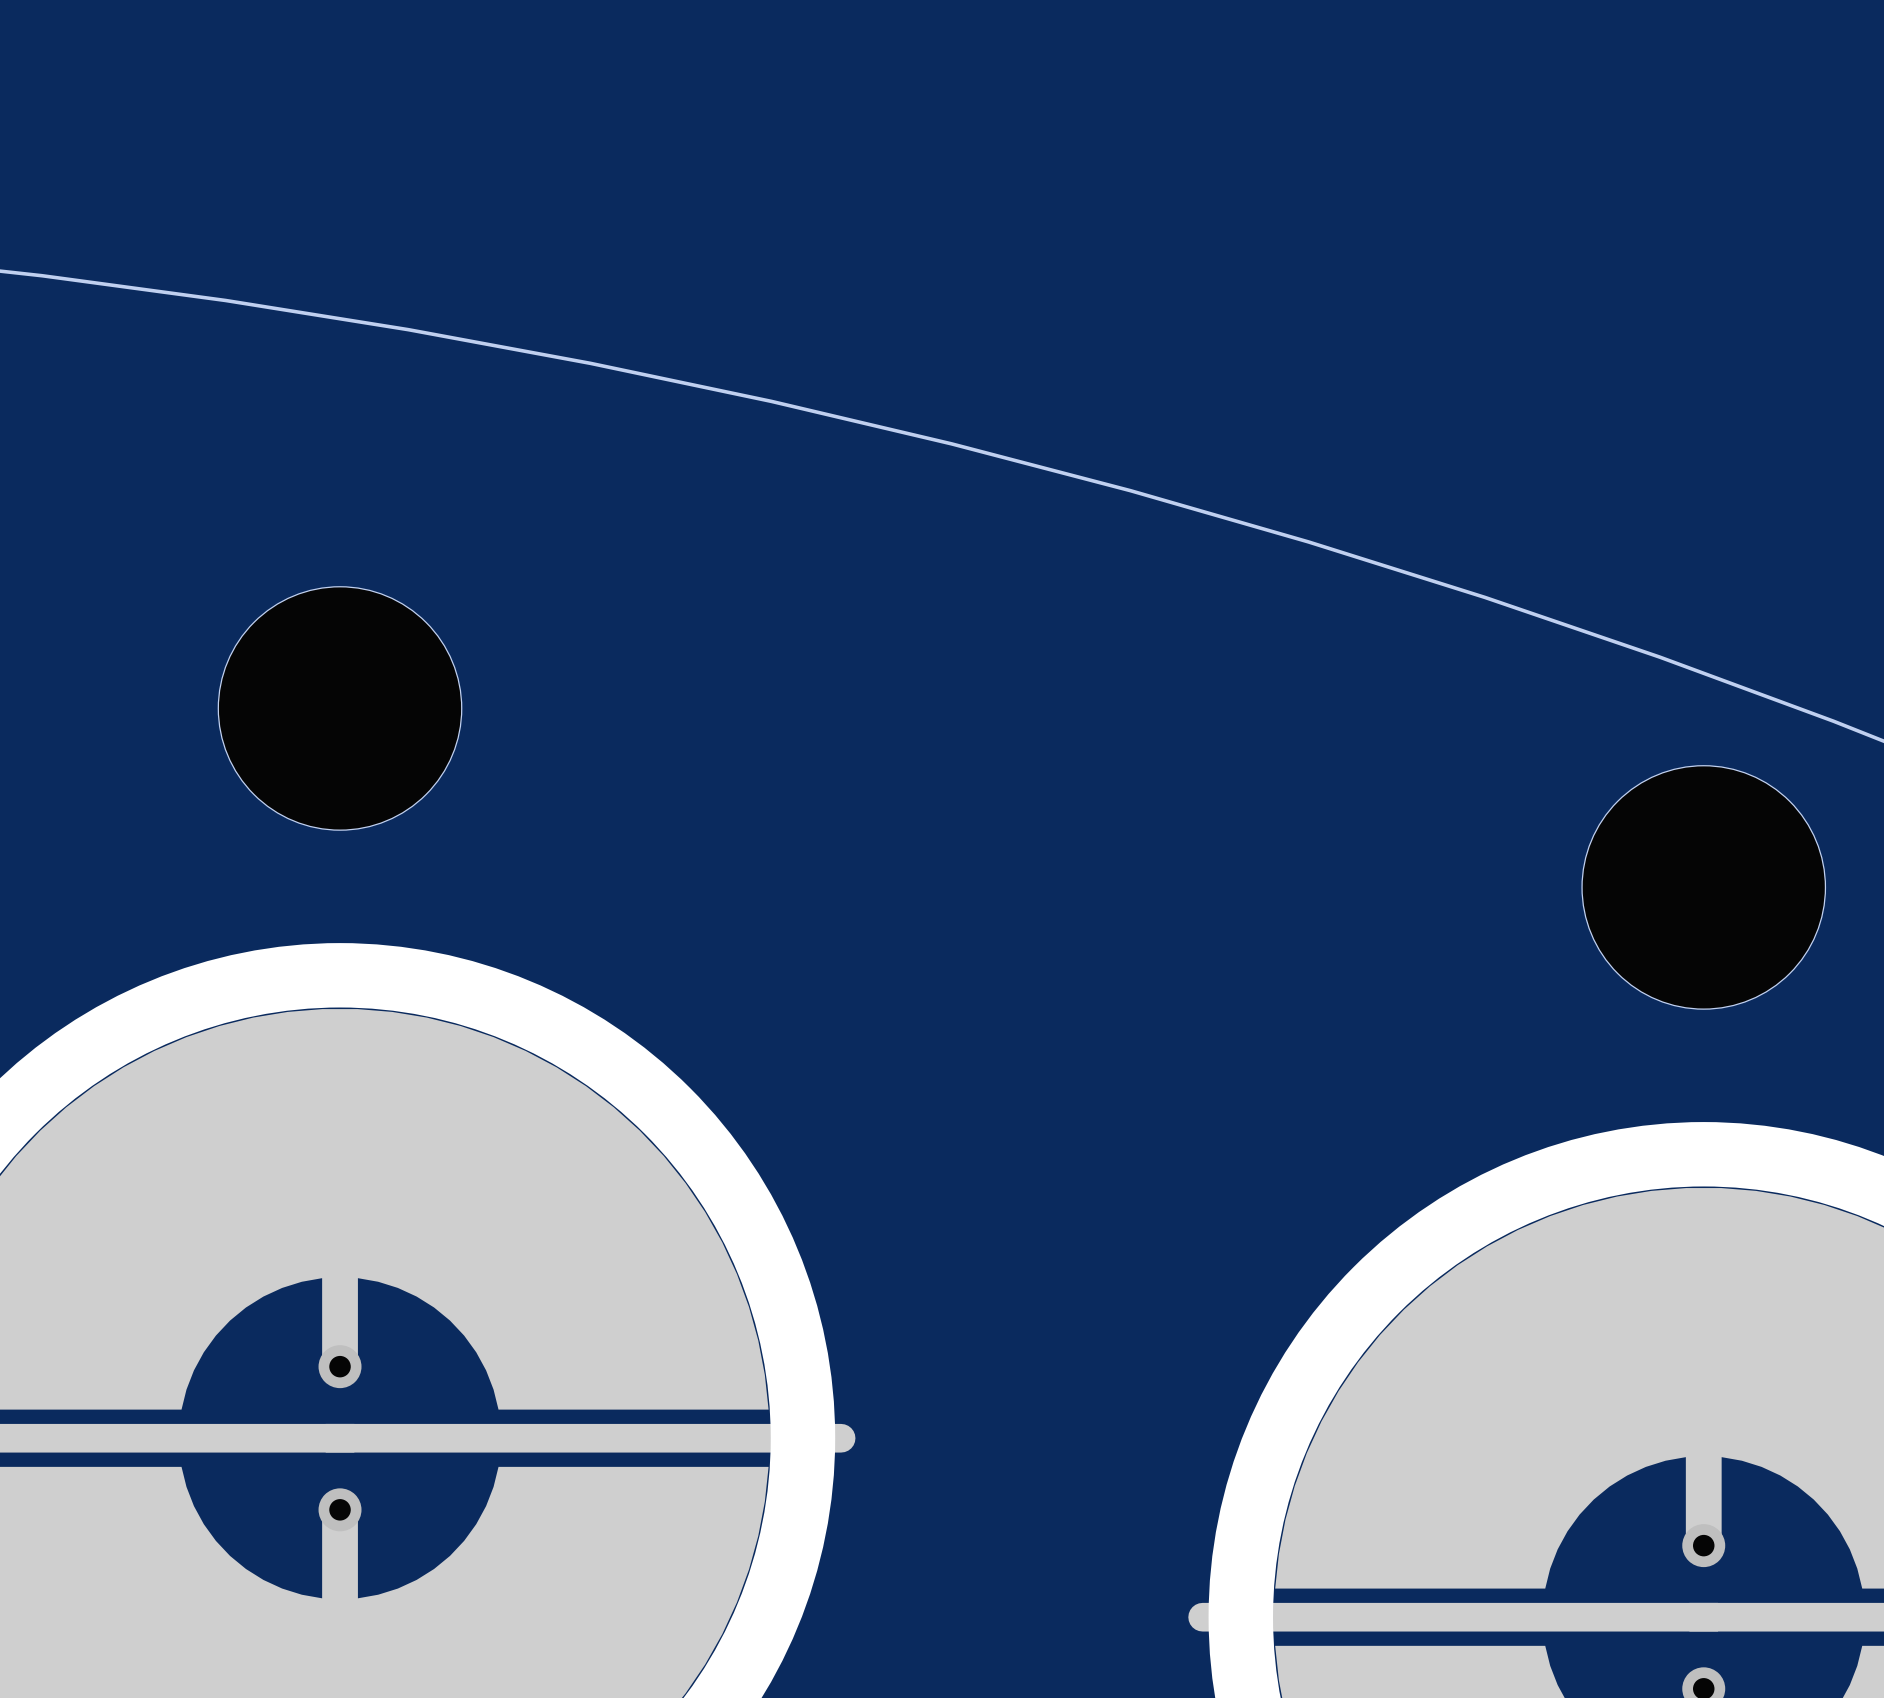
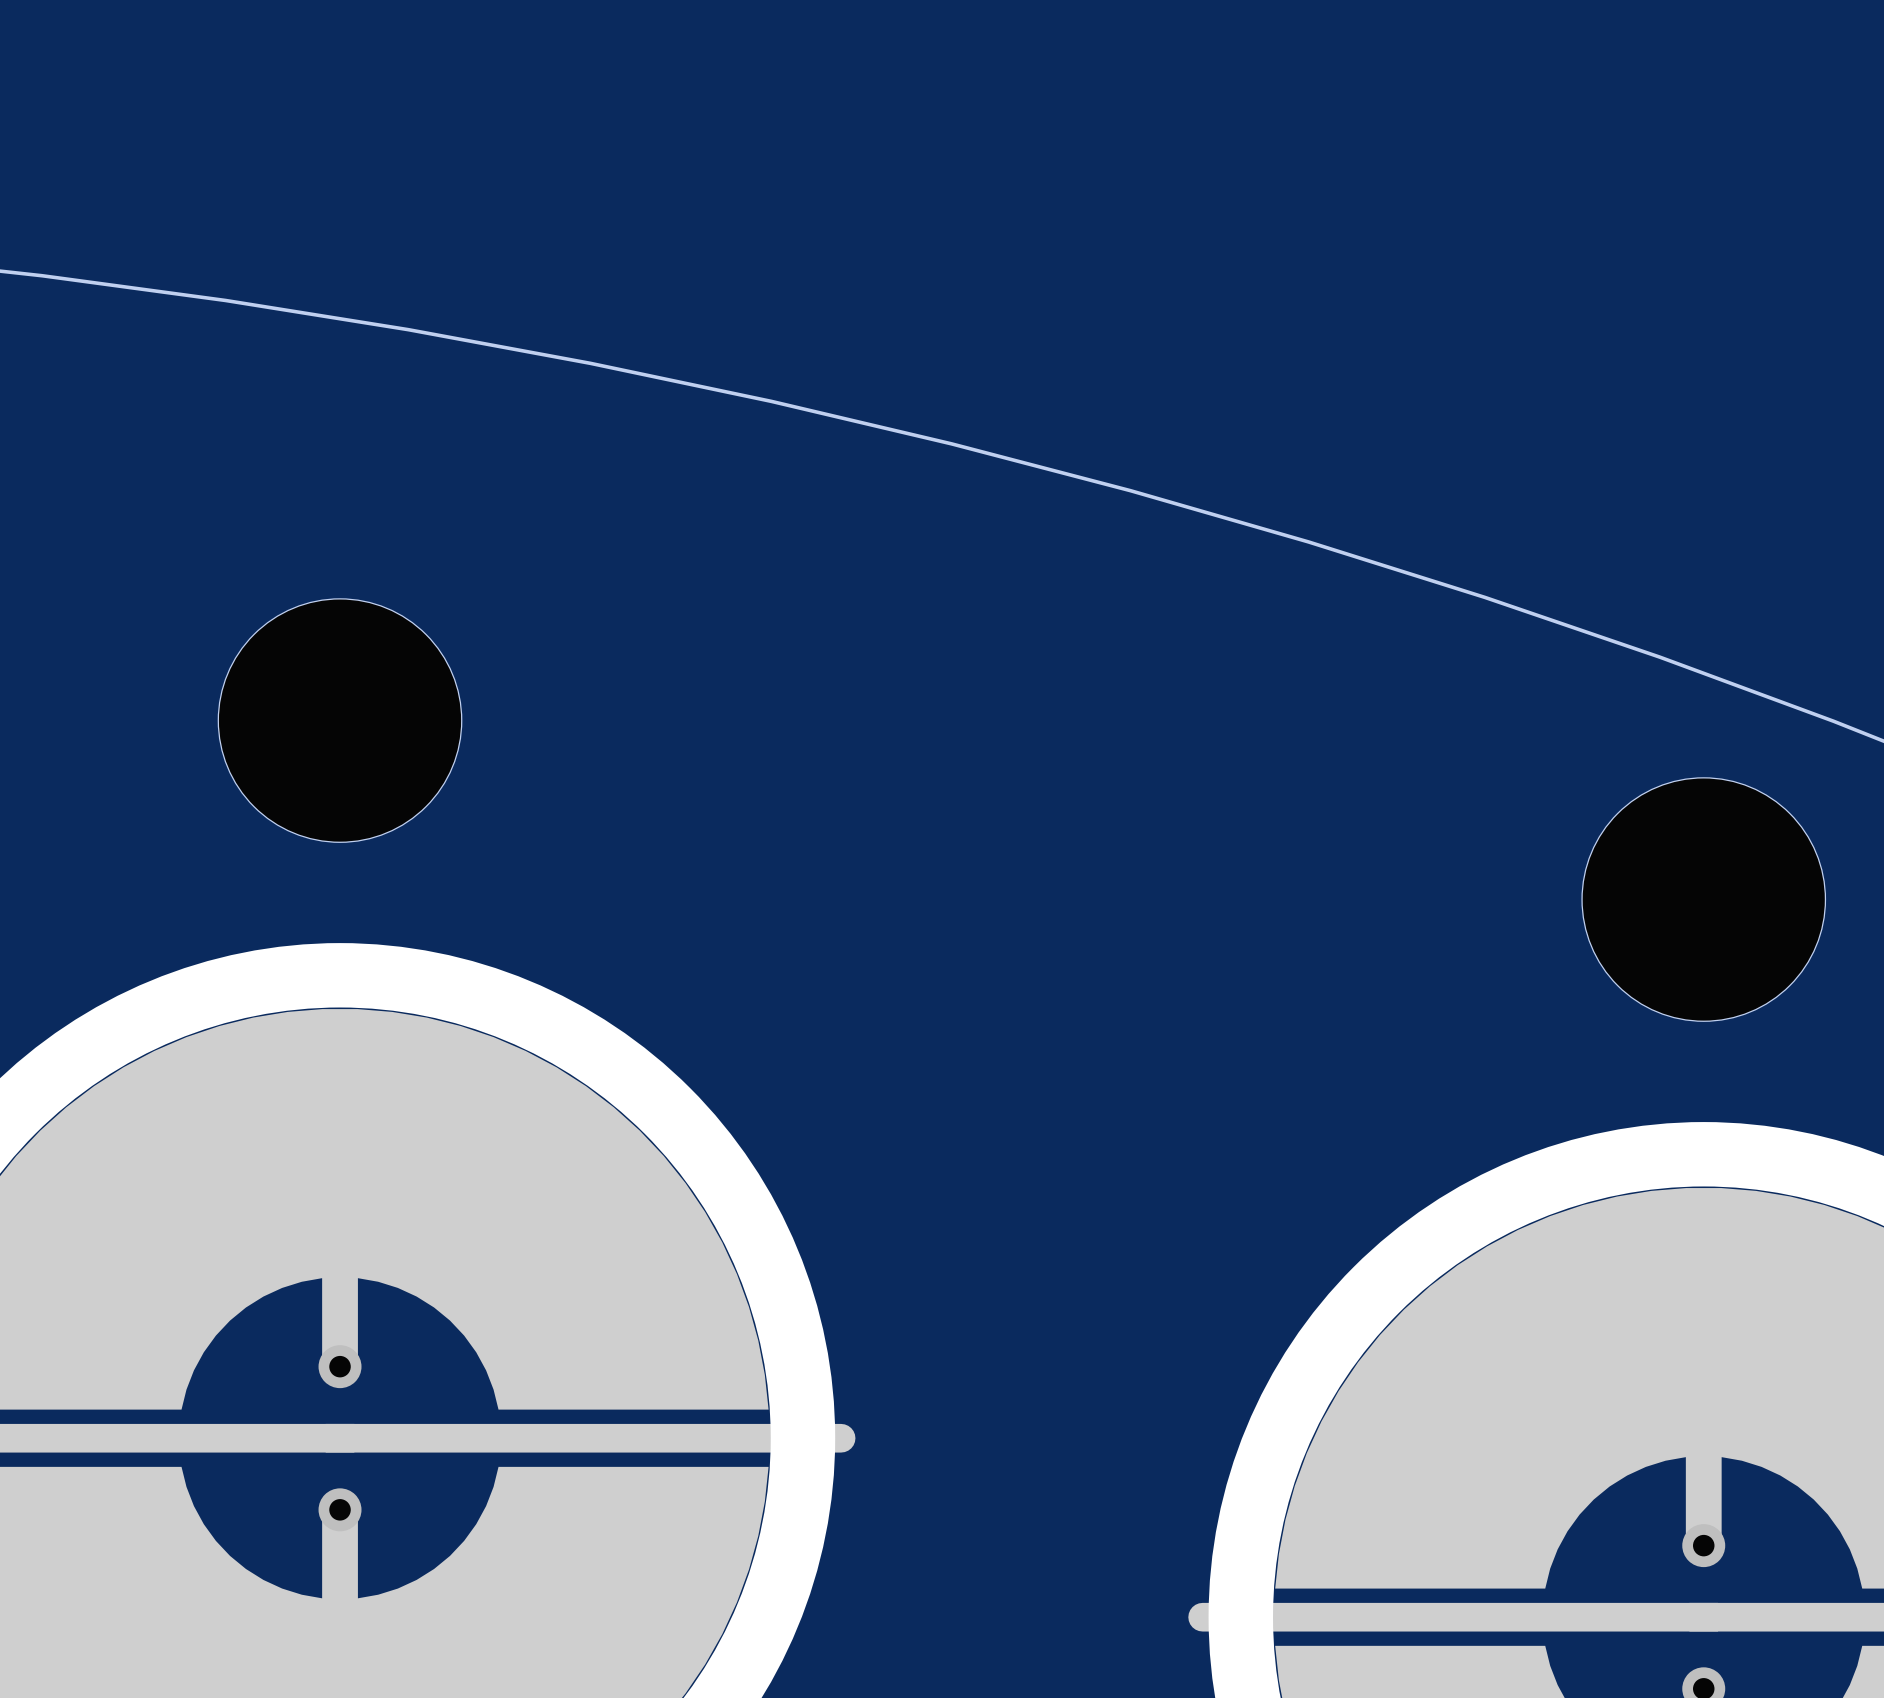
part position: (340, 708) -> (340, 720)
part position: (1703, 887) -> (1703, 899)

